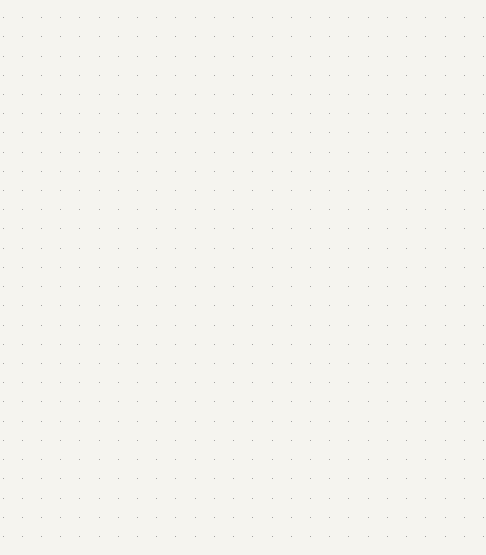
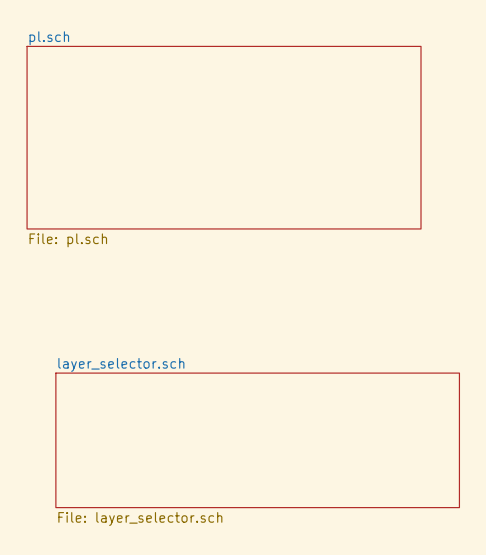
sheet pl.sch: none -> File: pl.sch (224, 137)
sheet layer_selector.sch: none -> File: layer_selector.sch (257, 440)

